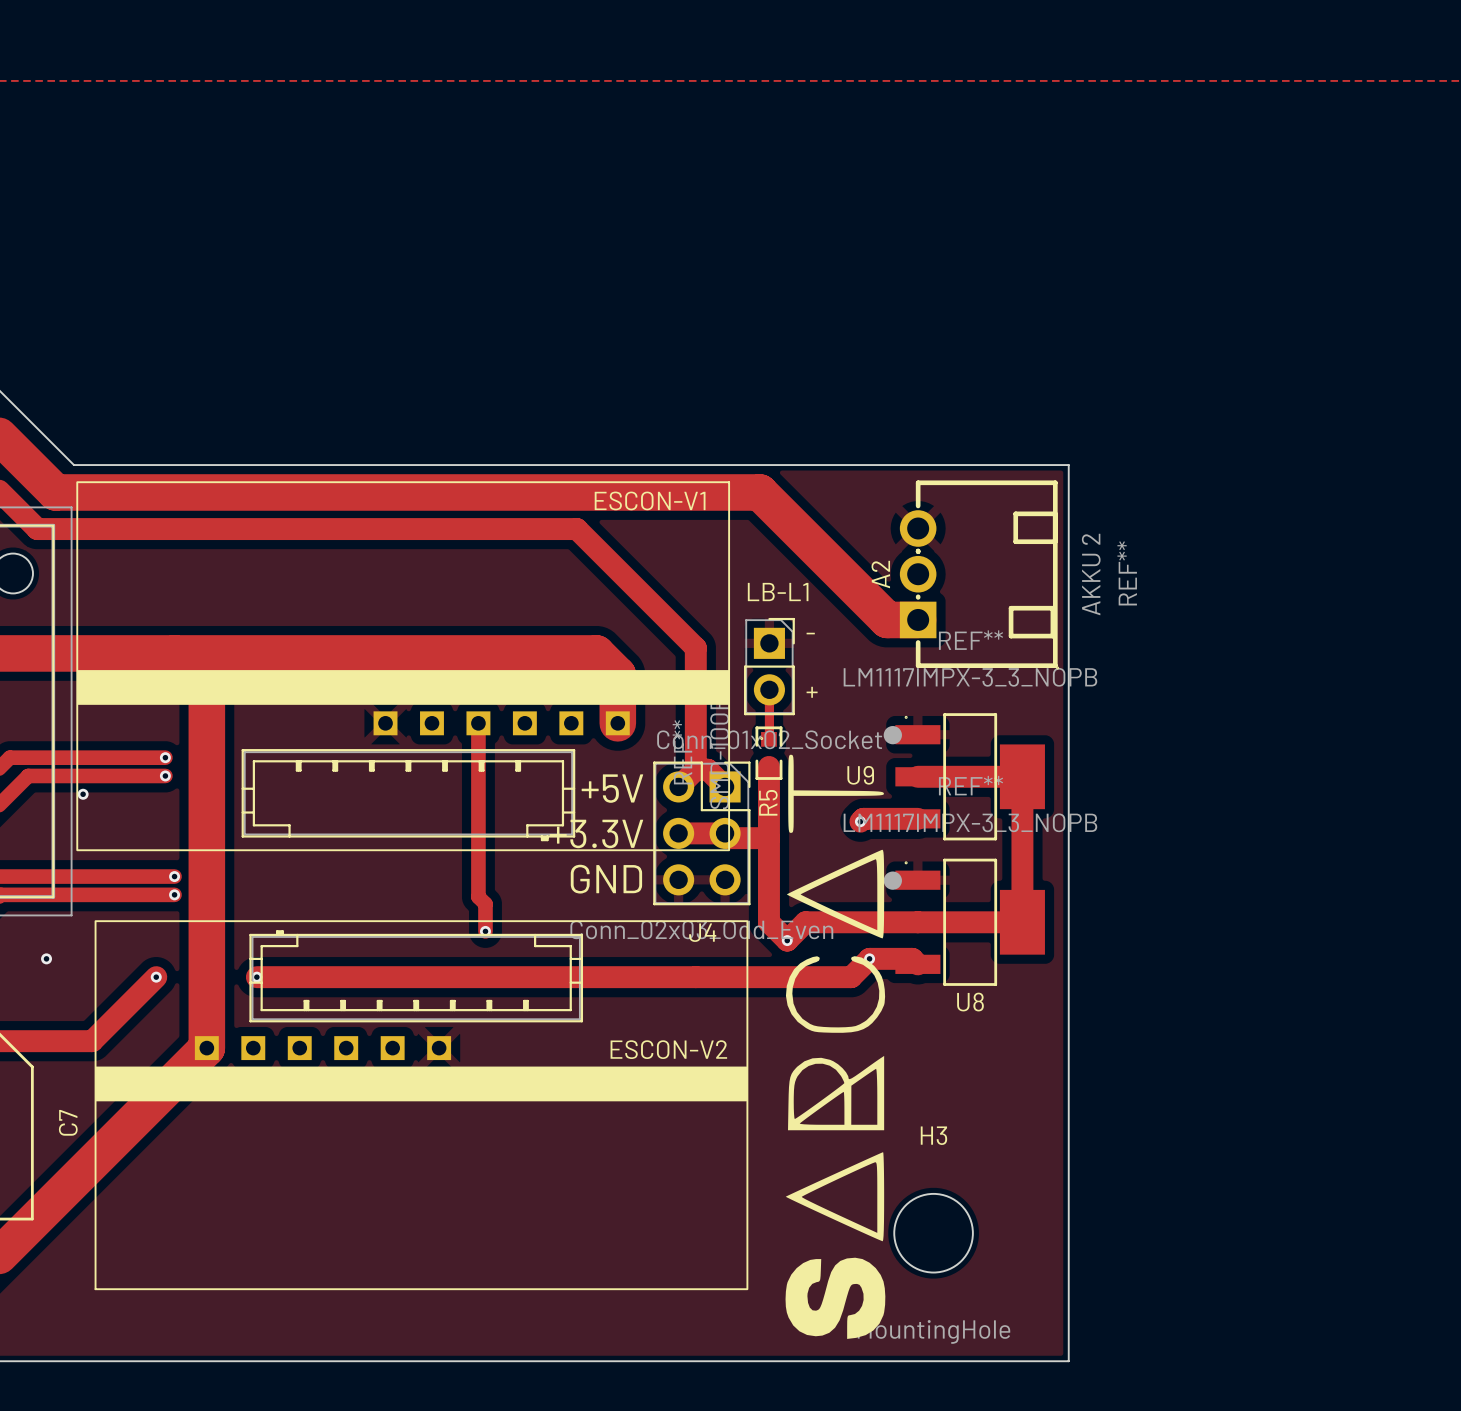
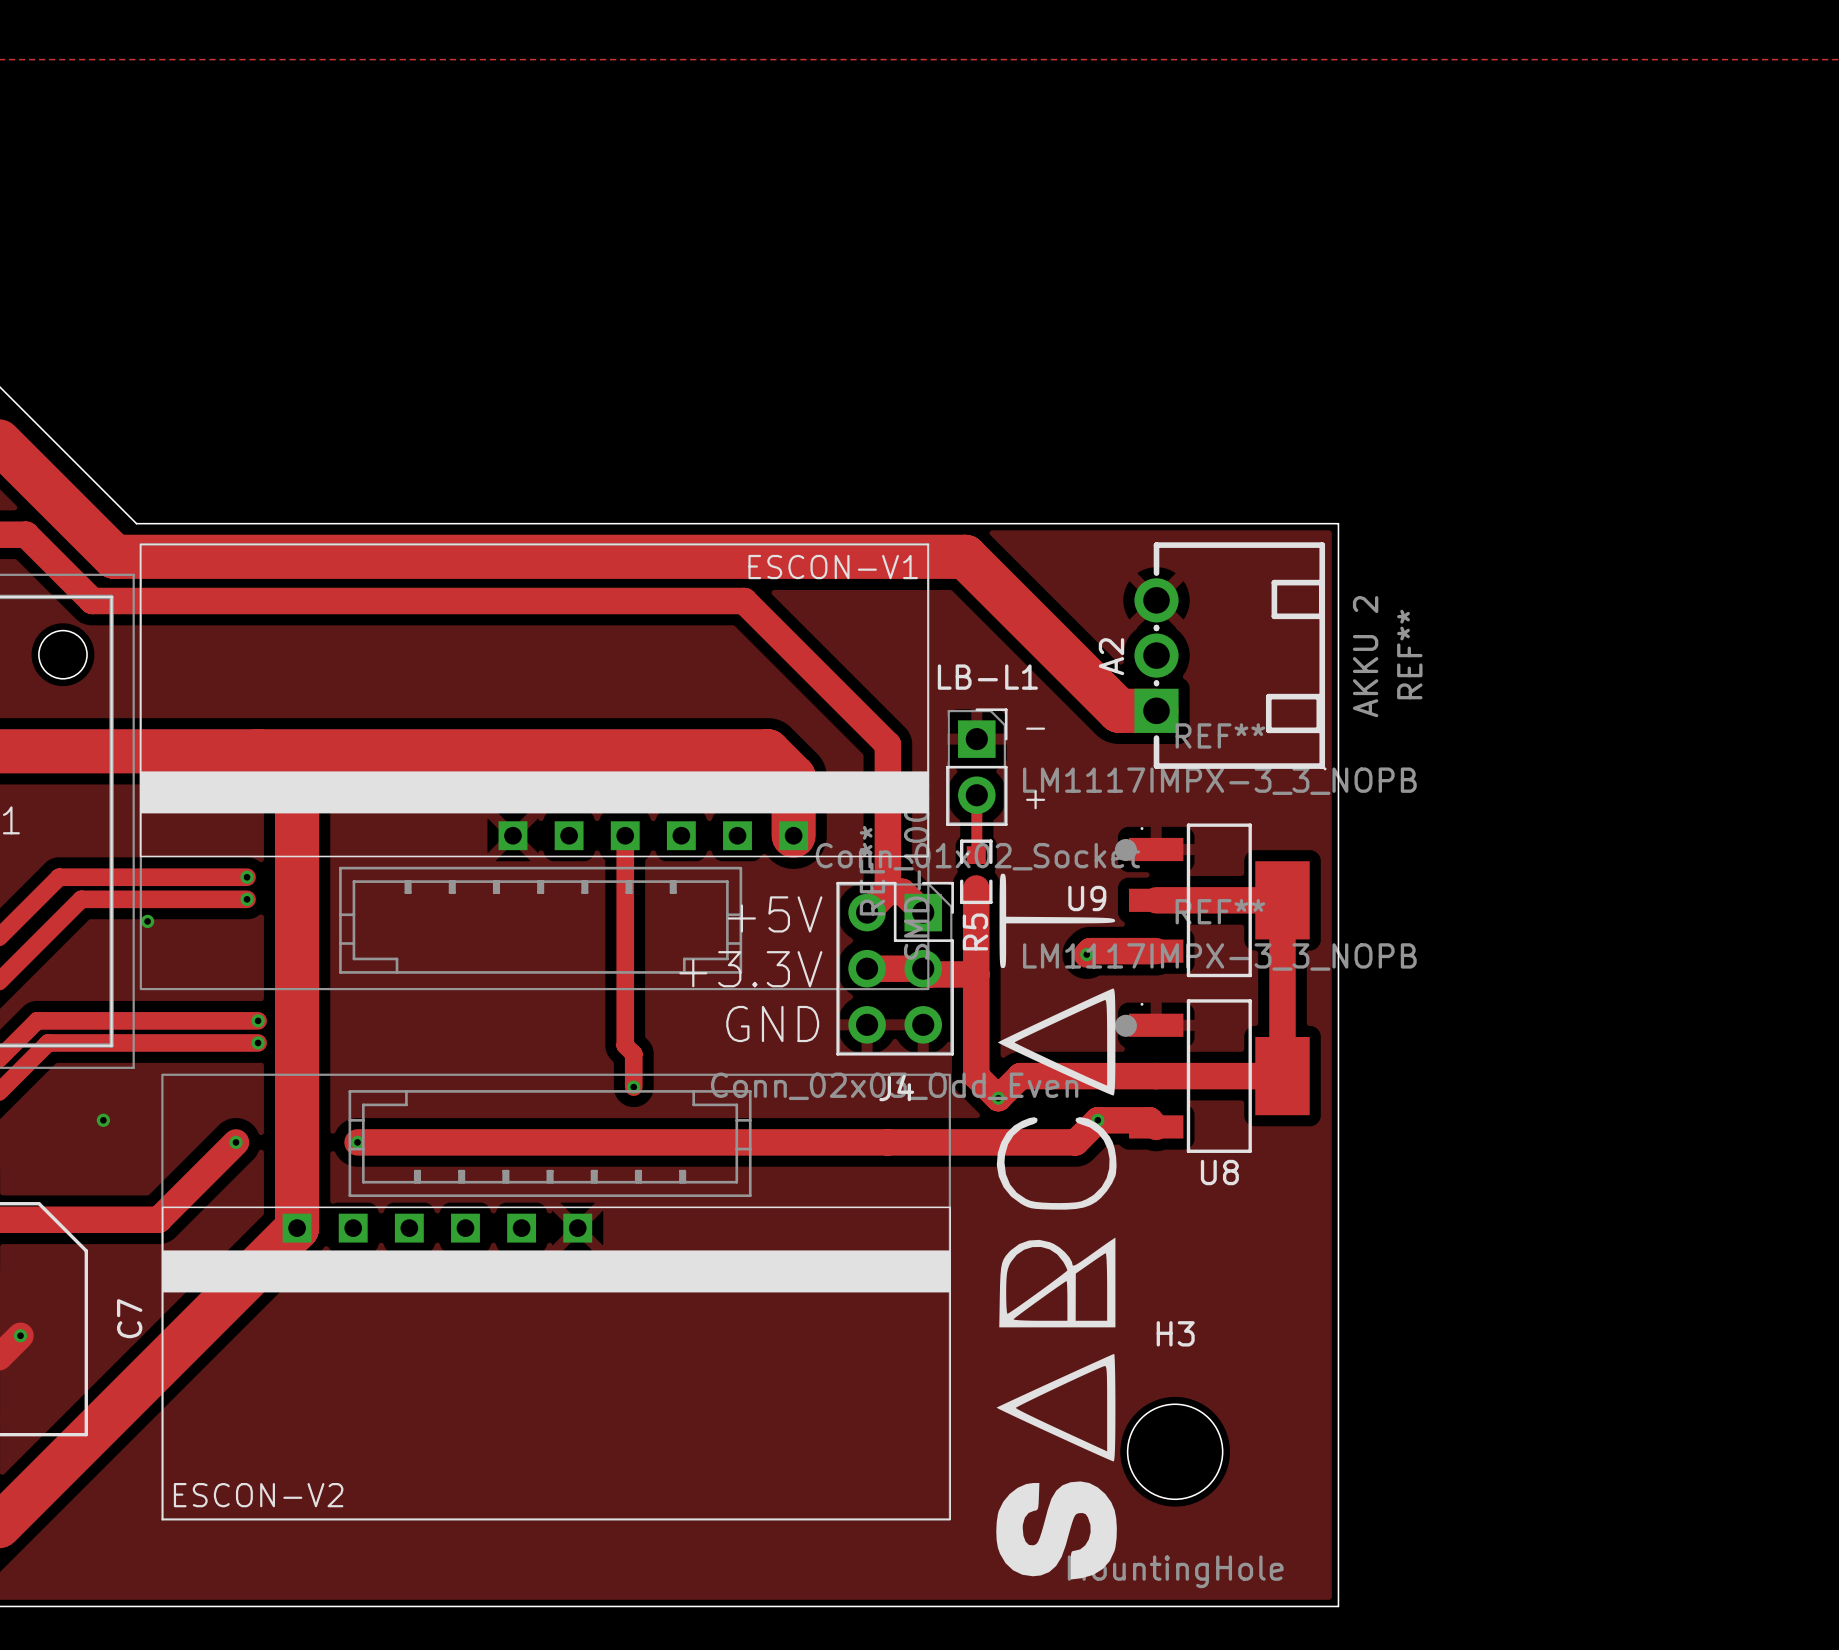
ESCON-V1 footprint: [76, 481, 730, 851] -> [139, 543, 930, 991]
ESCON-V2 footprint: [95, 920, 748, 1290] -> [161, 1073, 951, 1521]
ESCON-V2 name position: ESCON-V2 (668, 1049) -> ESCON-V2 (258, 1495)

